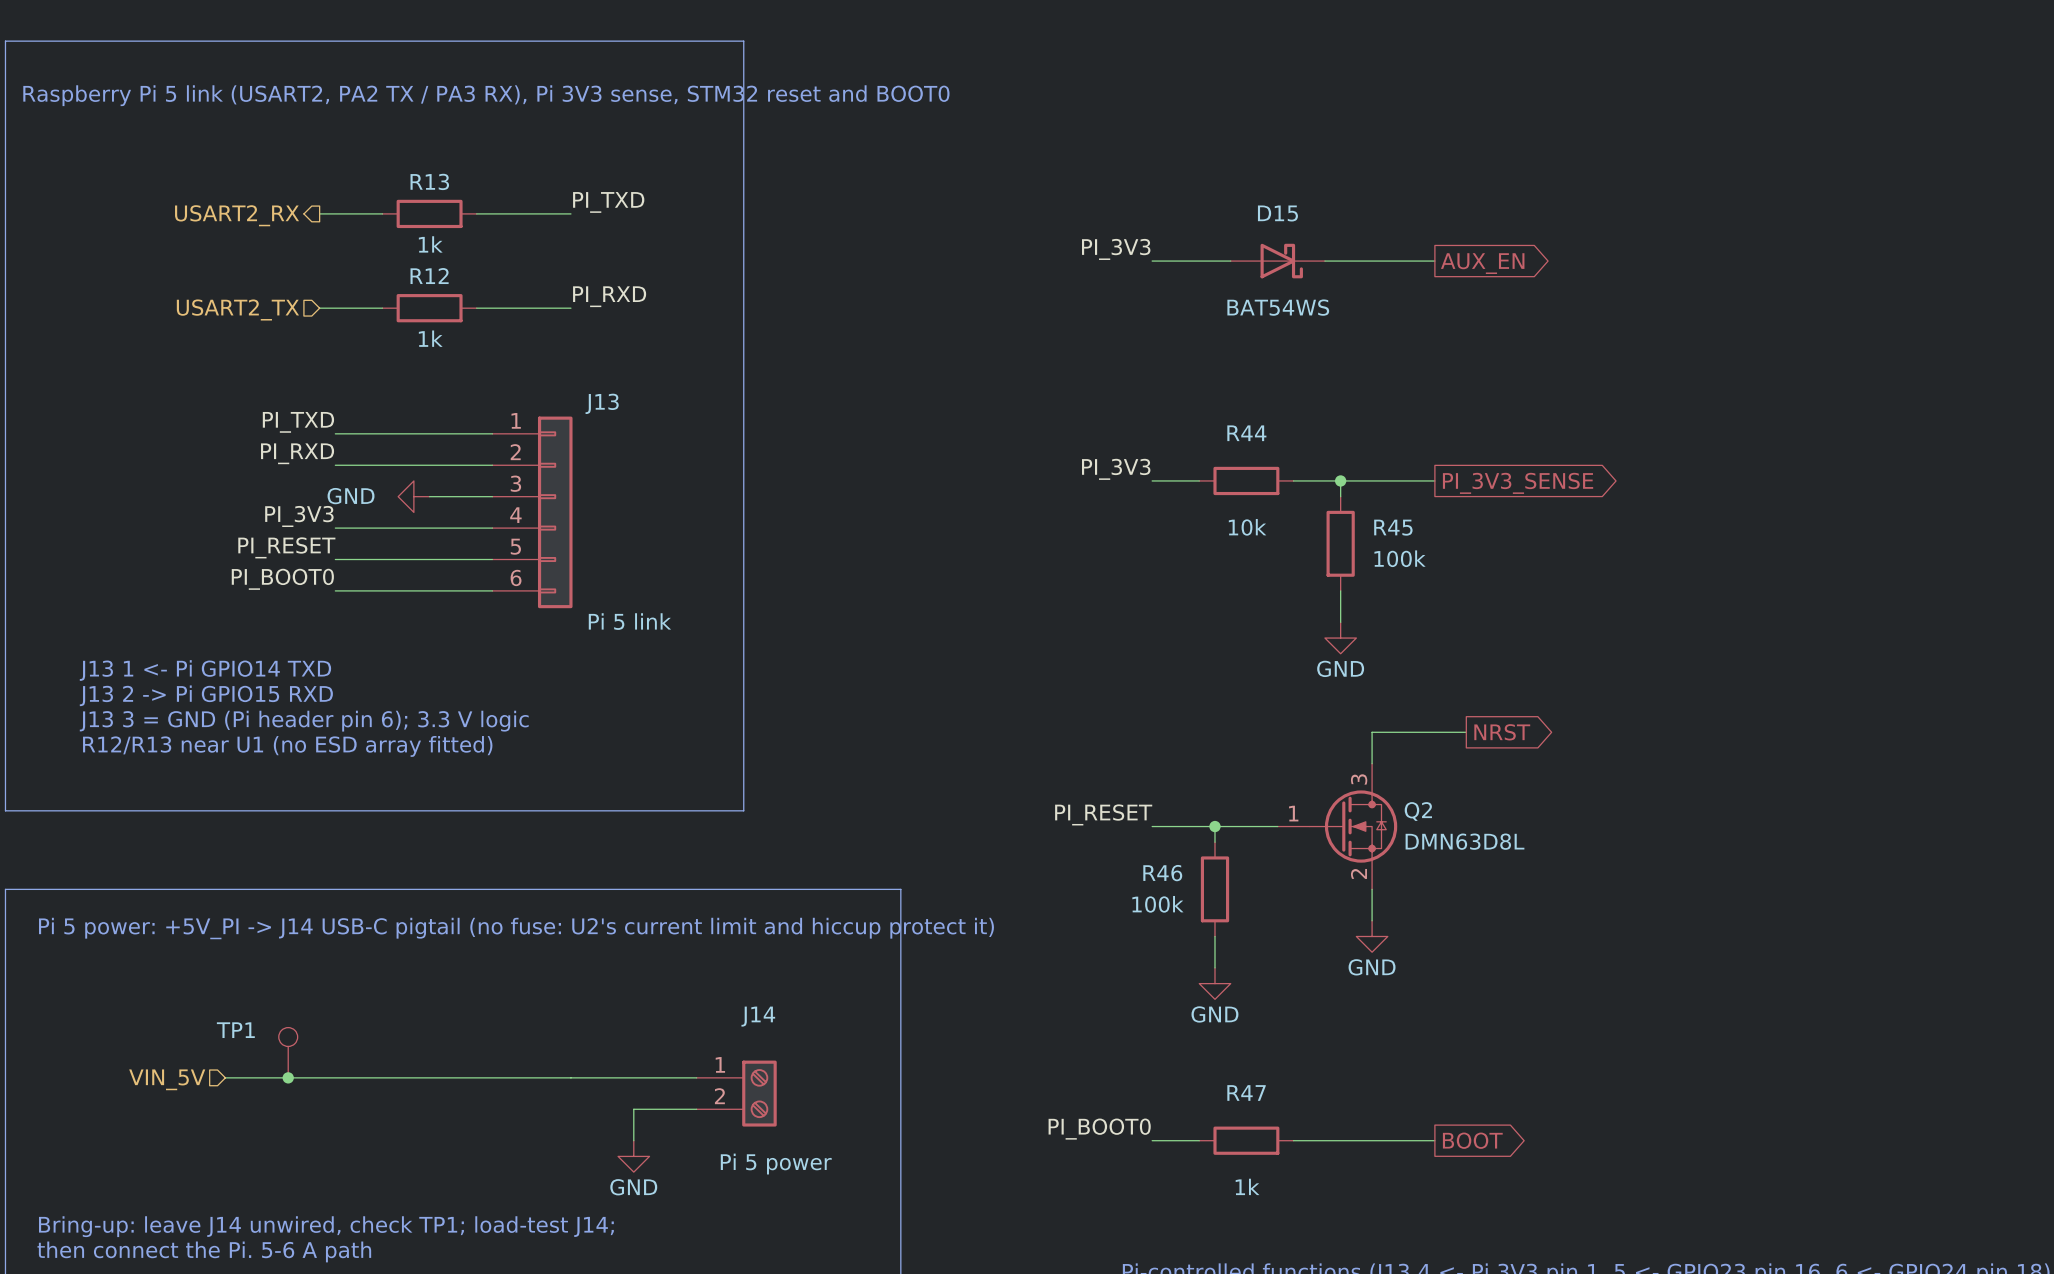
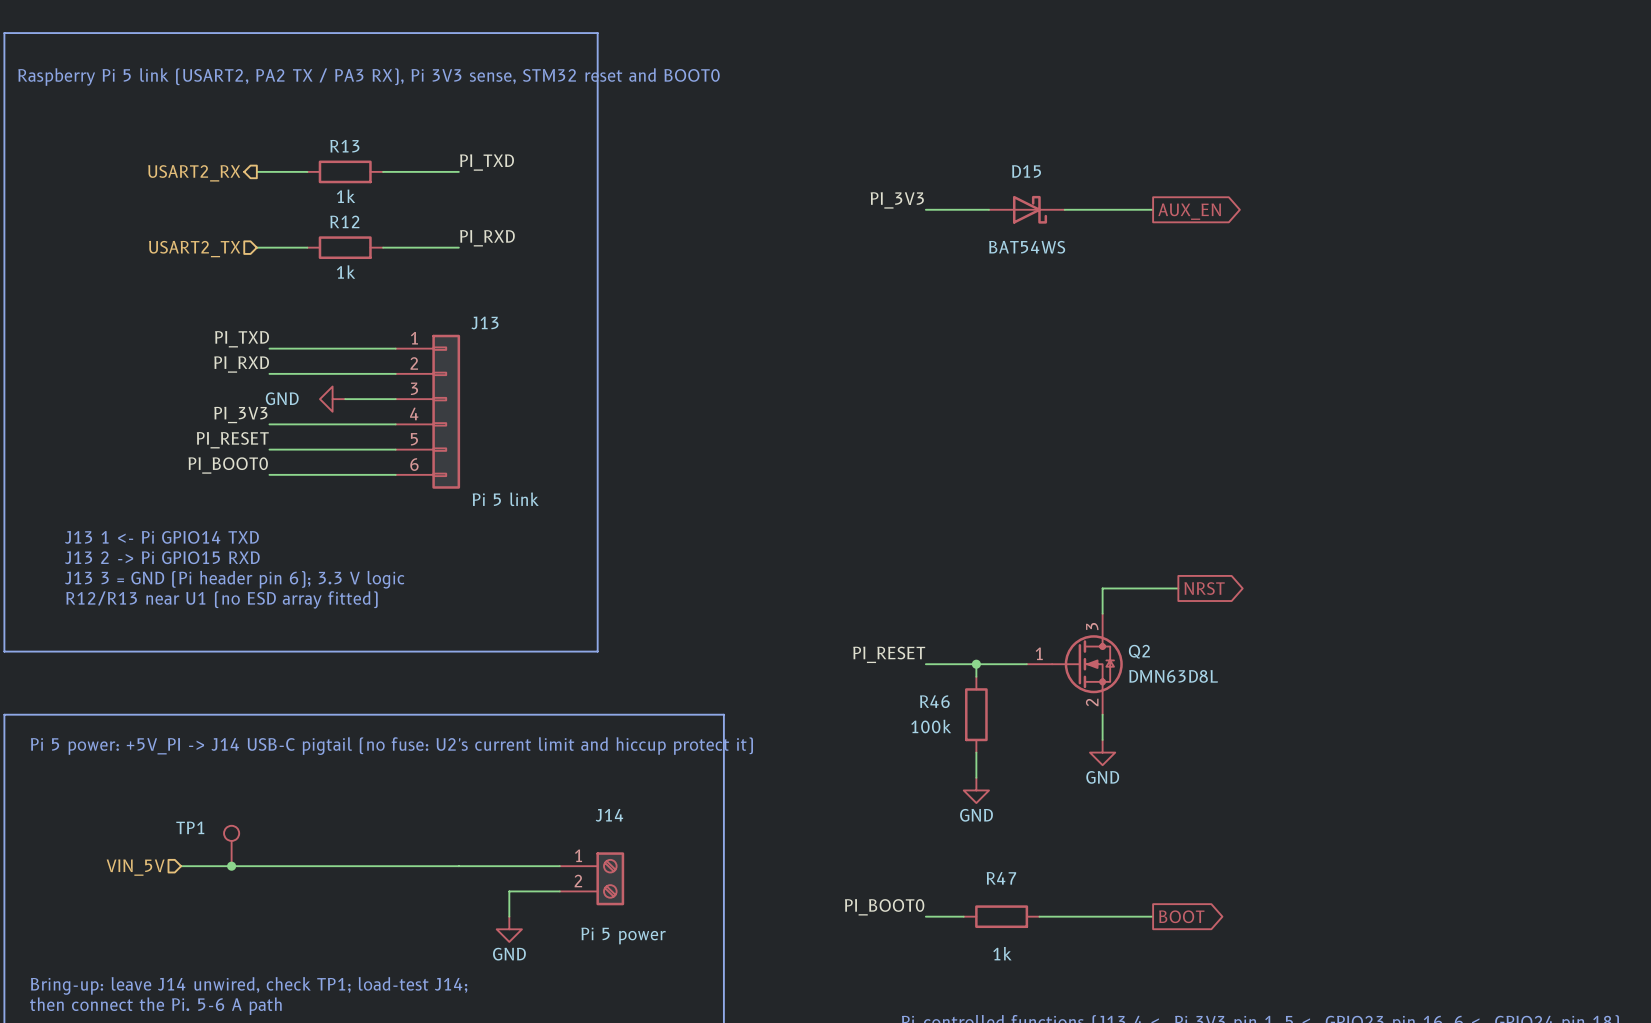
label: PI_3V3 (1116, 469) -> none
wire: (1152, 480) (1199, 480) -> none
R44: 10k (1246, 480) -> none
wire: (1293, 480) (1434, 480) -> none
wire: (1340, 480) (1340, 496) -> none
junction: (1340, 480) -> none
global label: PI_3V3_SENSE (1518, 483) -> none
R45: 100k (1340, 543) -> none
wire: (1340, 590) (1340, 622) -> none
power symbol: GND (1340, 638) -> none

